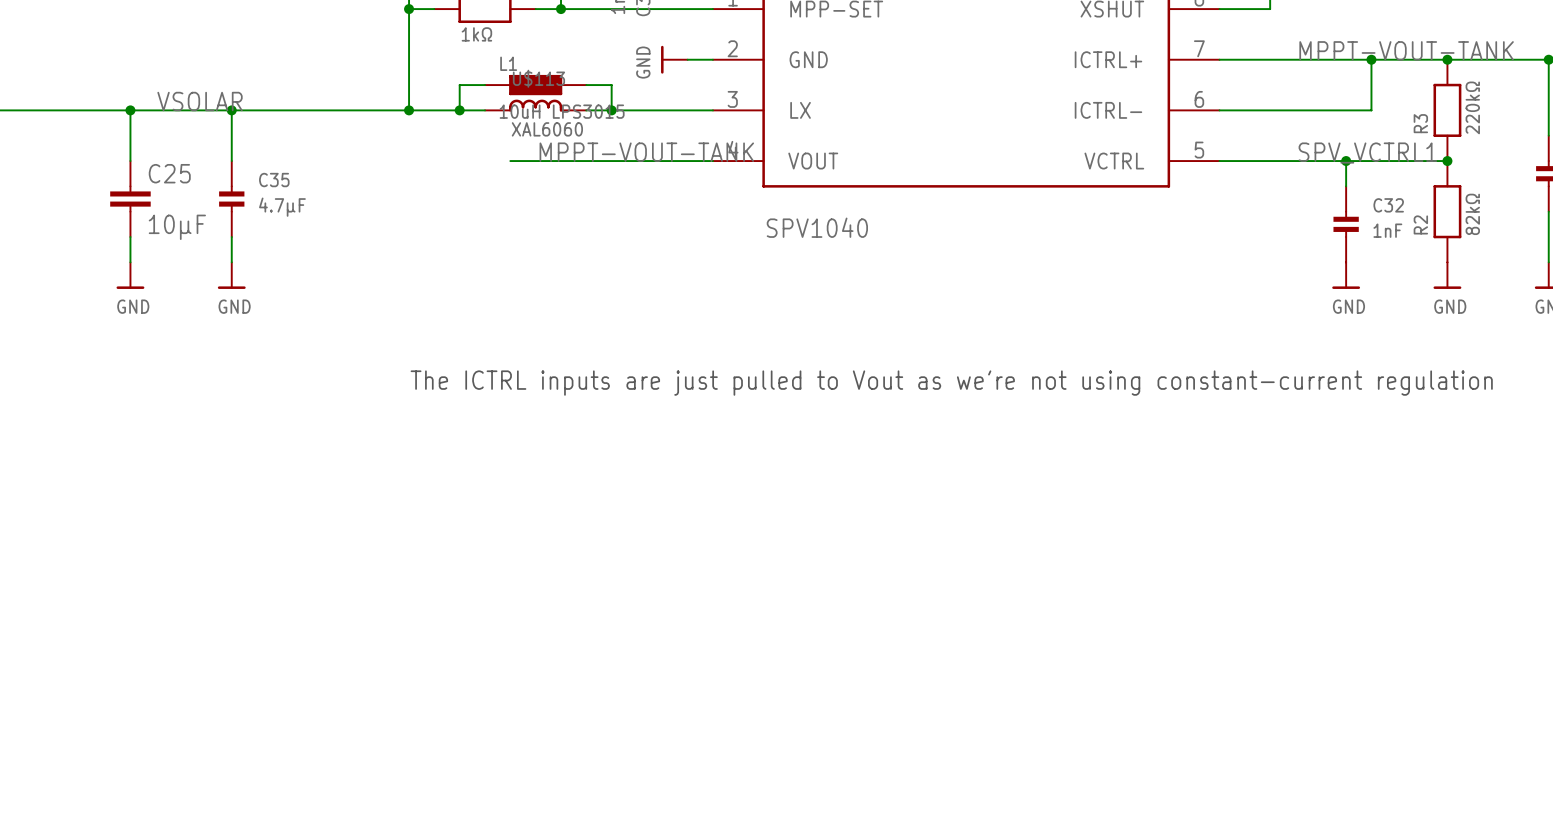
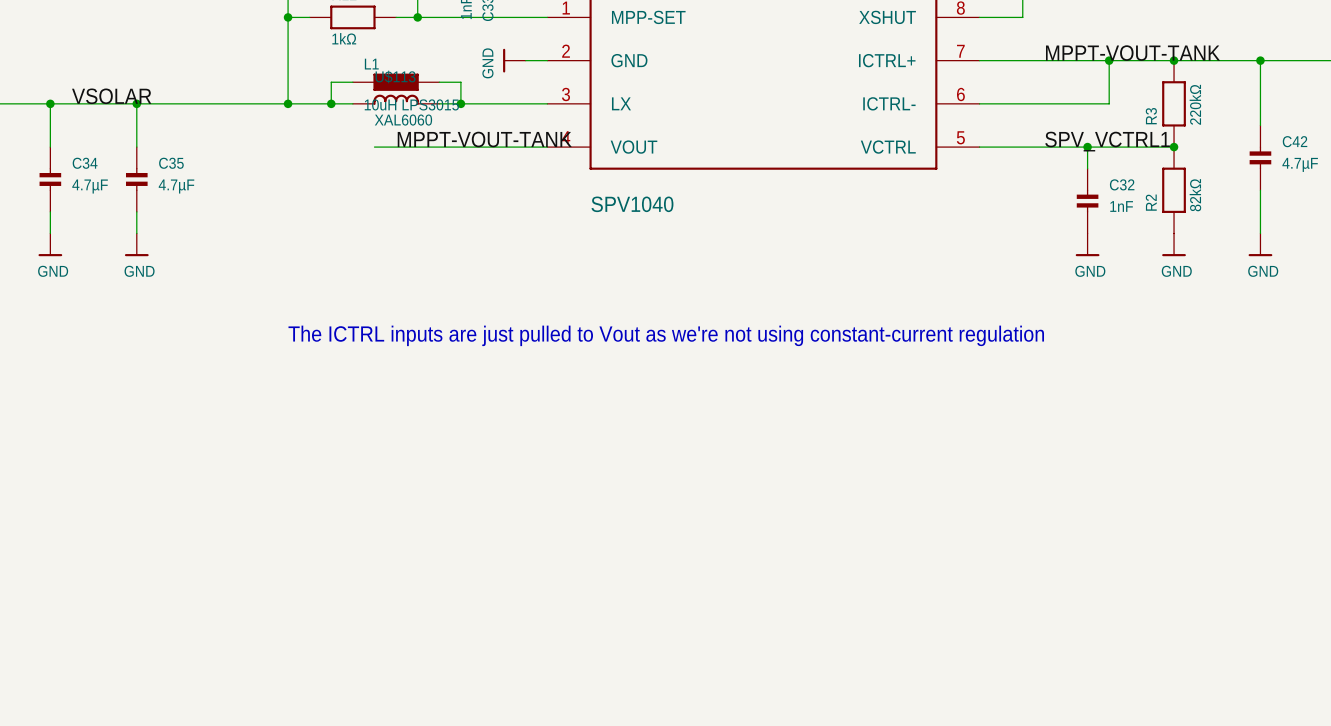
C25: 10µF (130, 199) -> none
C34: none -> 4.7µF (50, 179)

